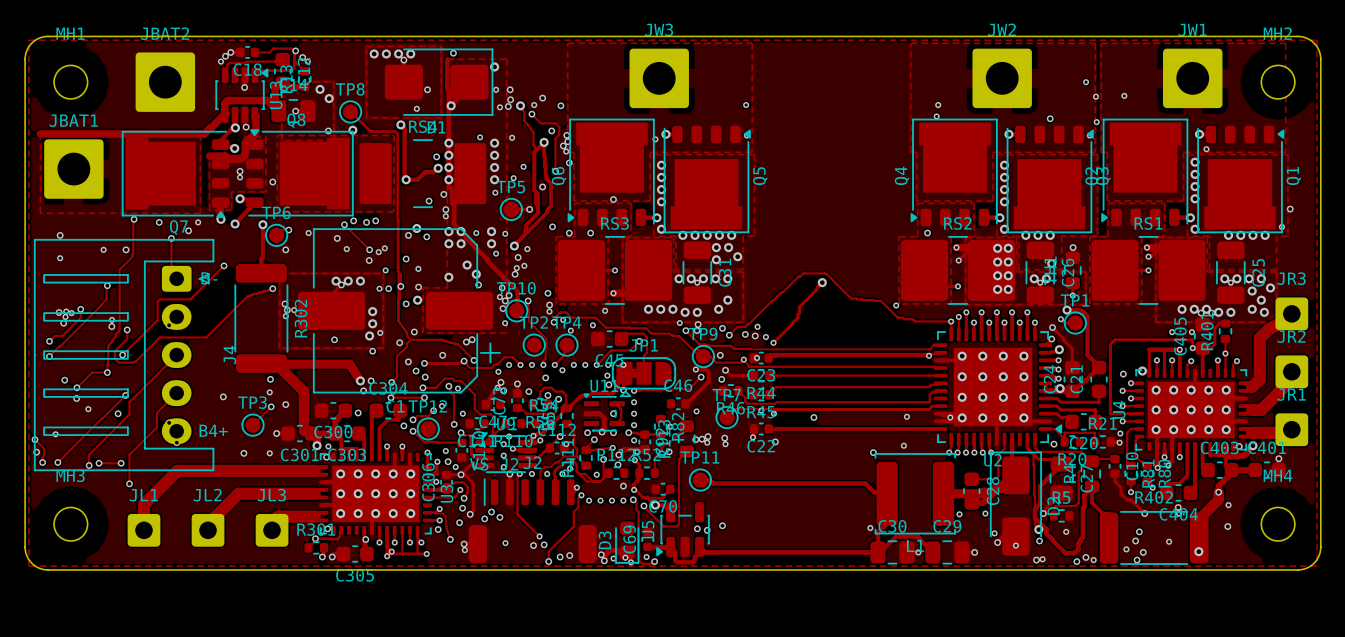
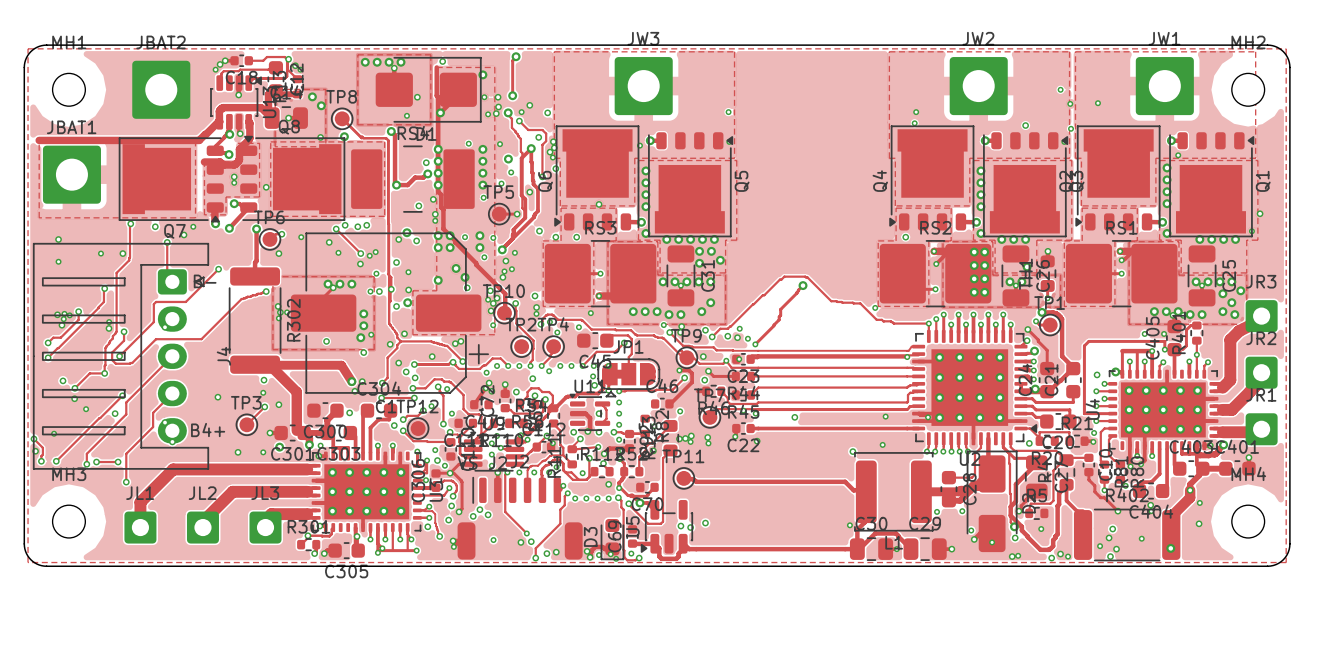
track: none -> (516, 57) (512, 60) (512, 95)
via: none -> (516, 56)
via: none -> (512, 95)
via: none -> (508, 159)
via: none -> (279, 447)

